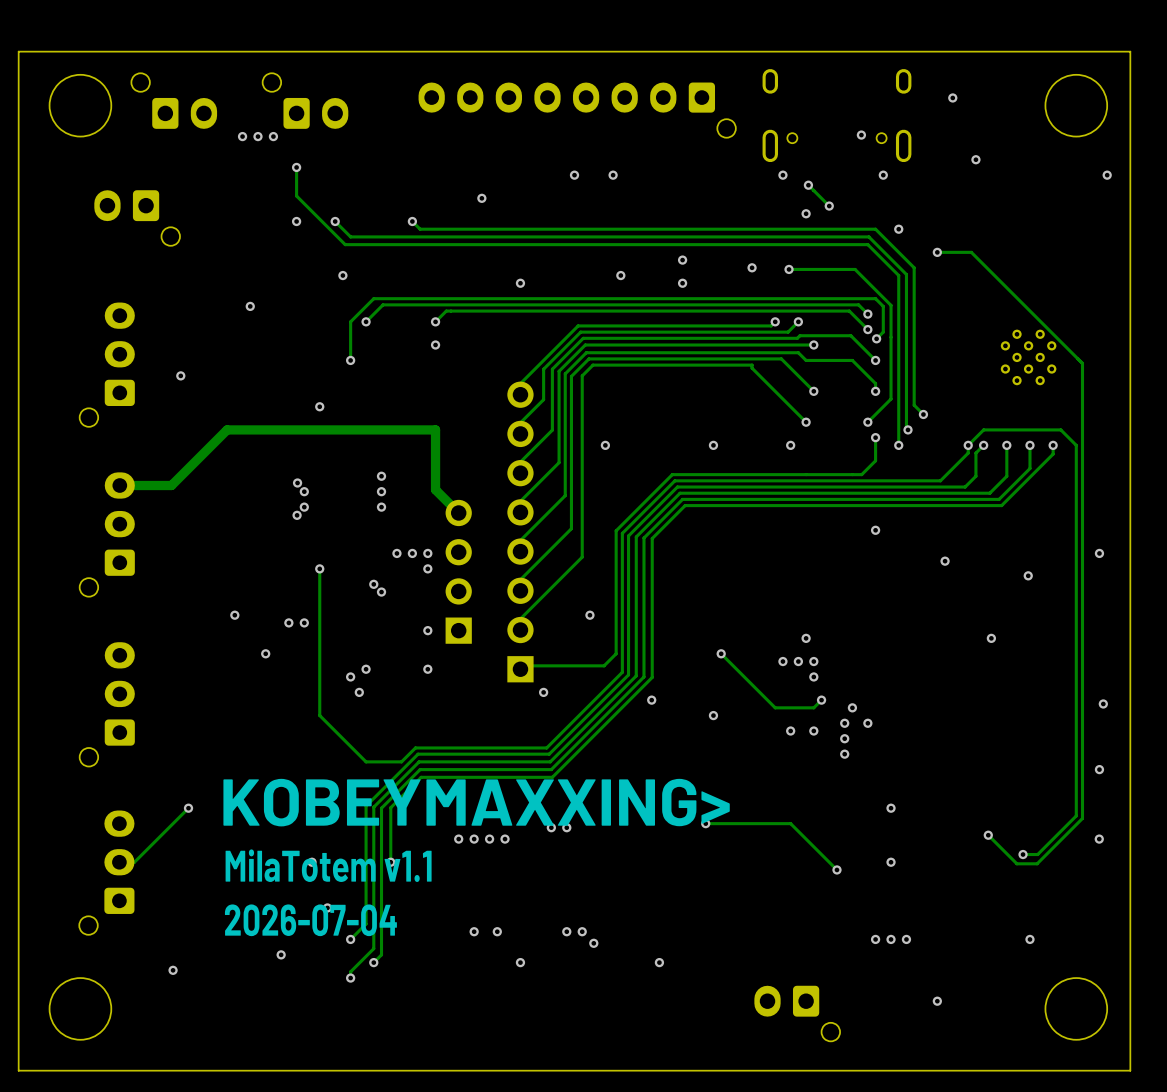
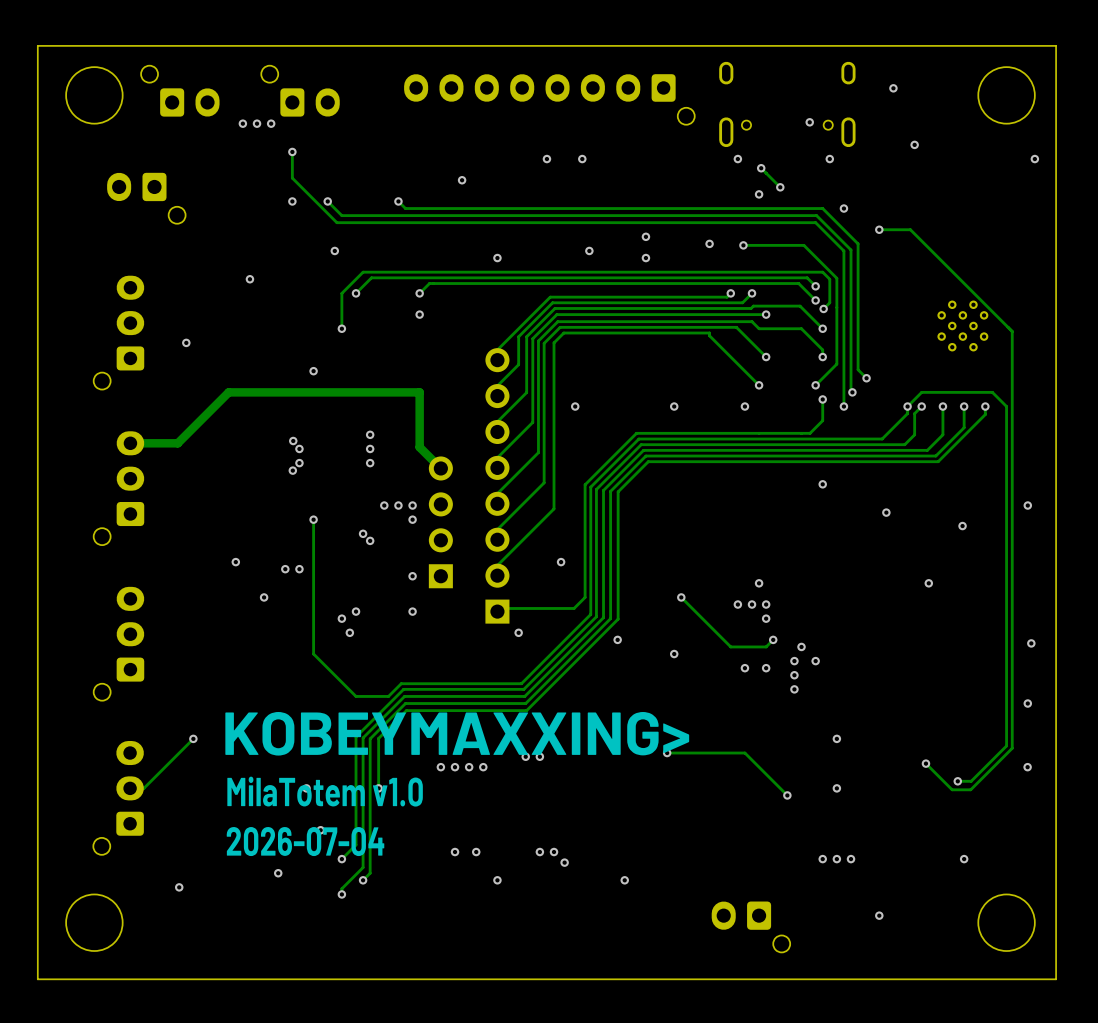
text: MilaTotem v1.1 (328, 865) -> MilaTotem v1.0 (325, 791)

